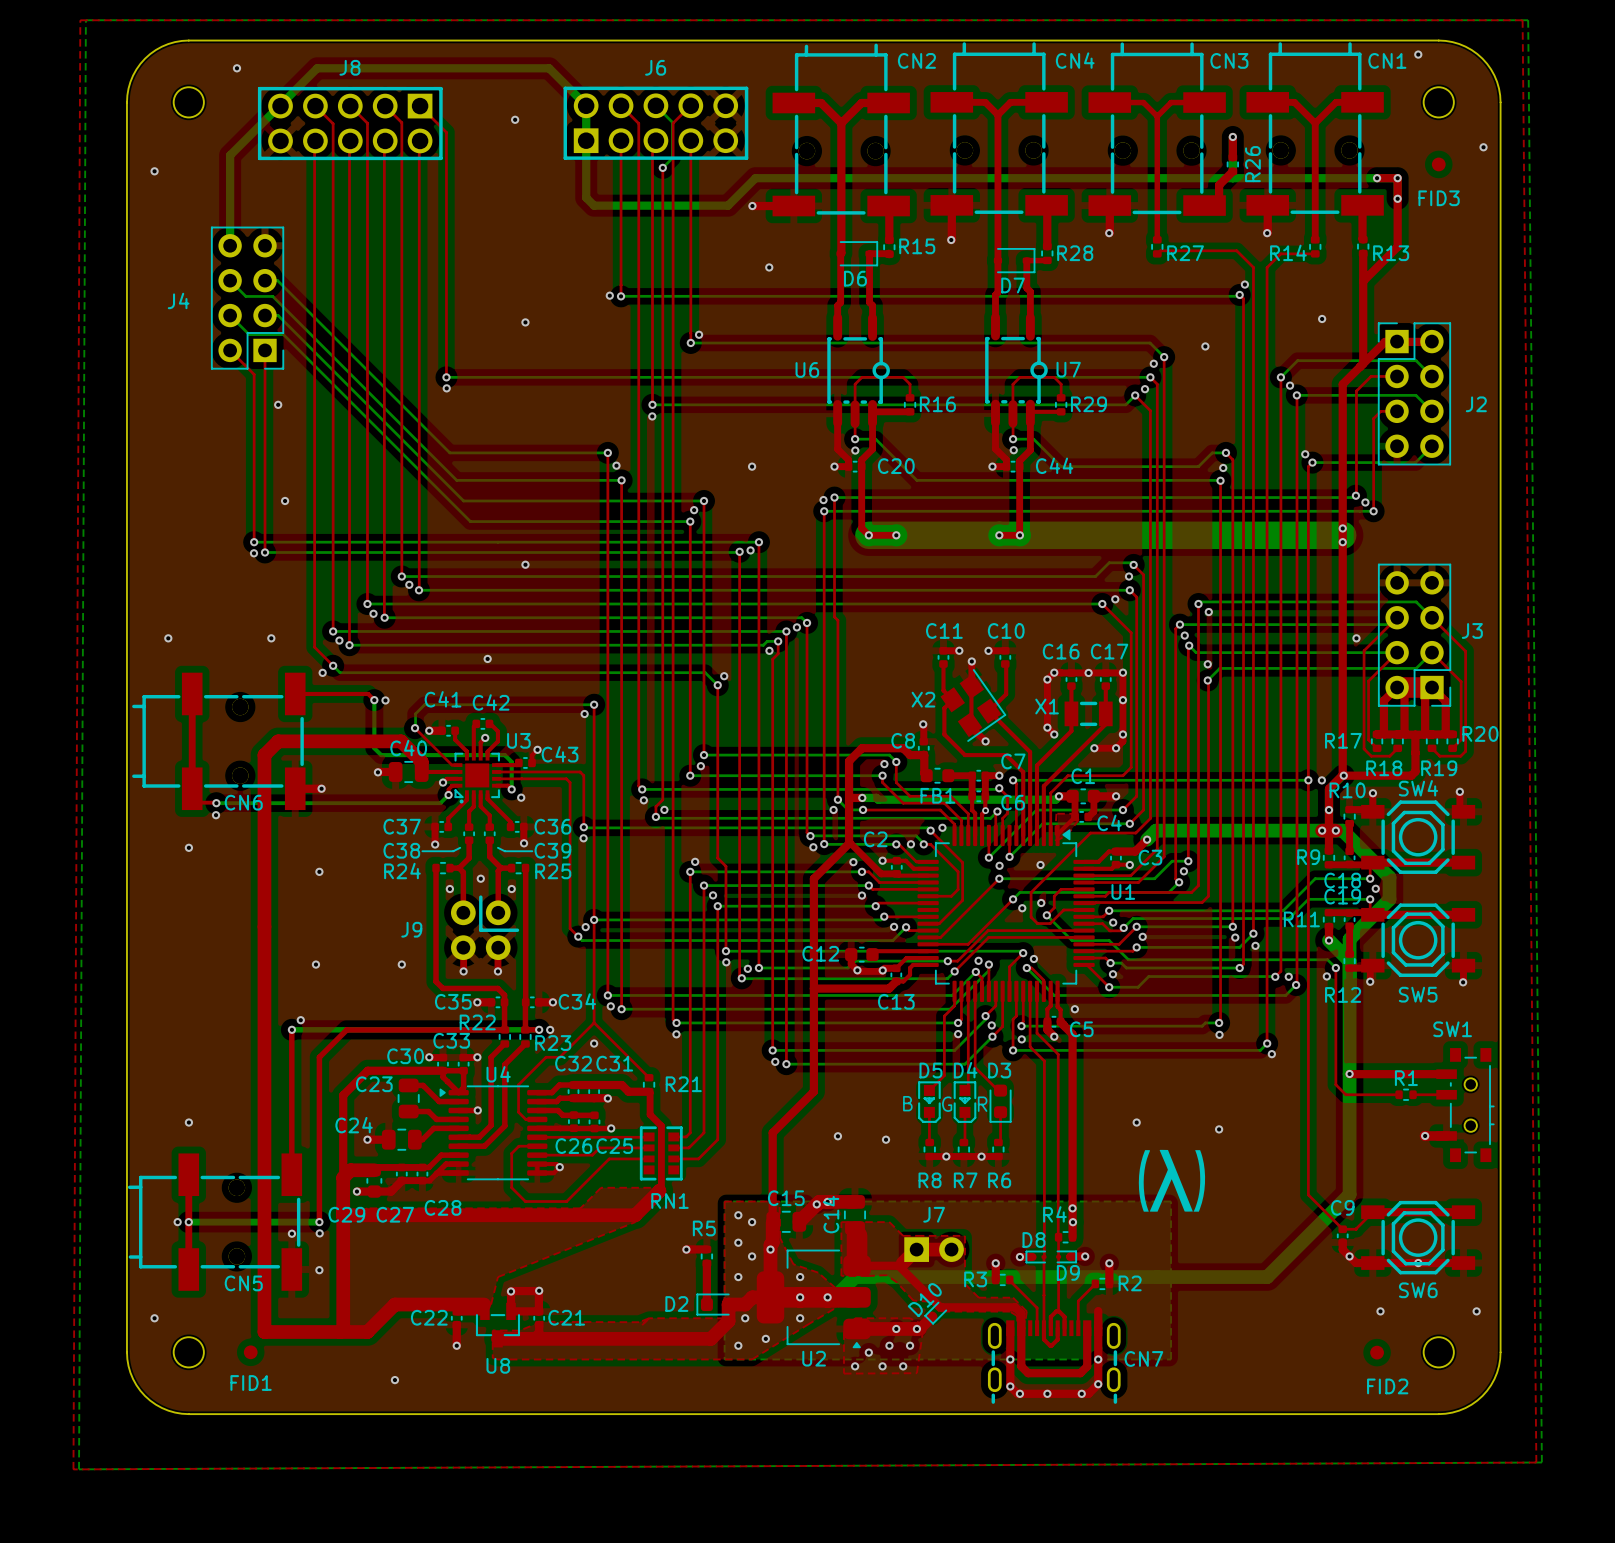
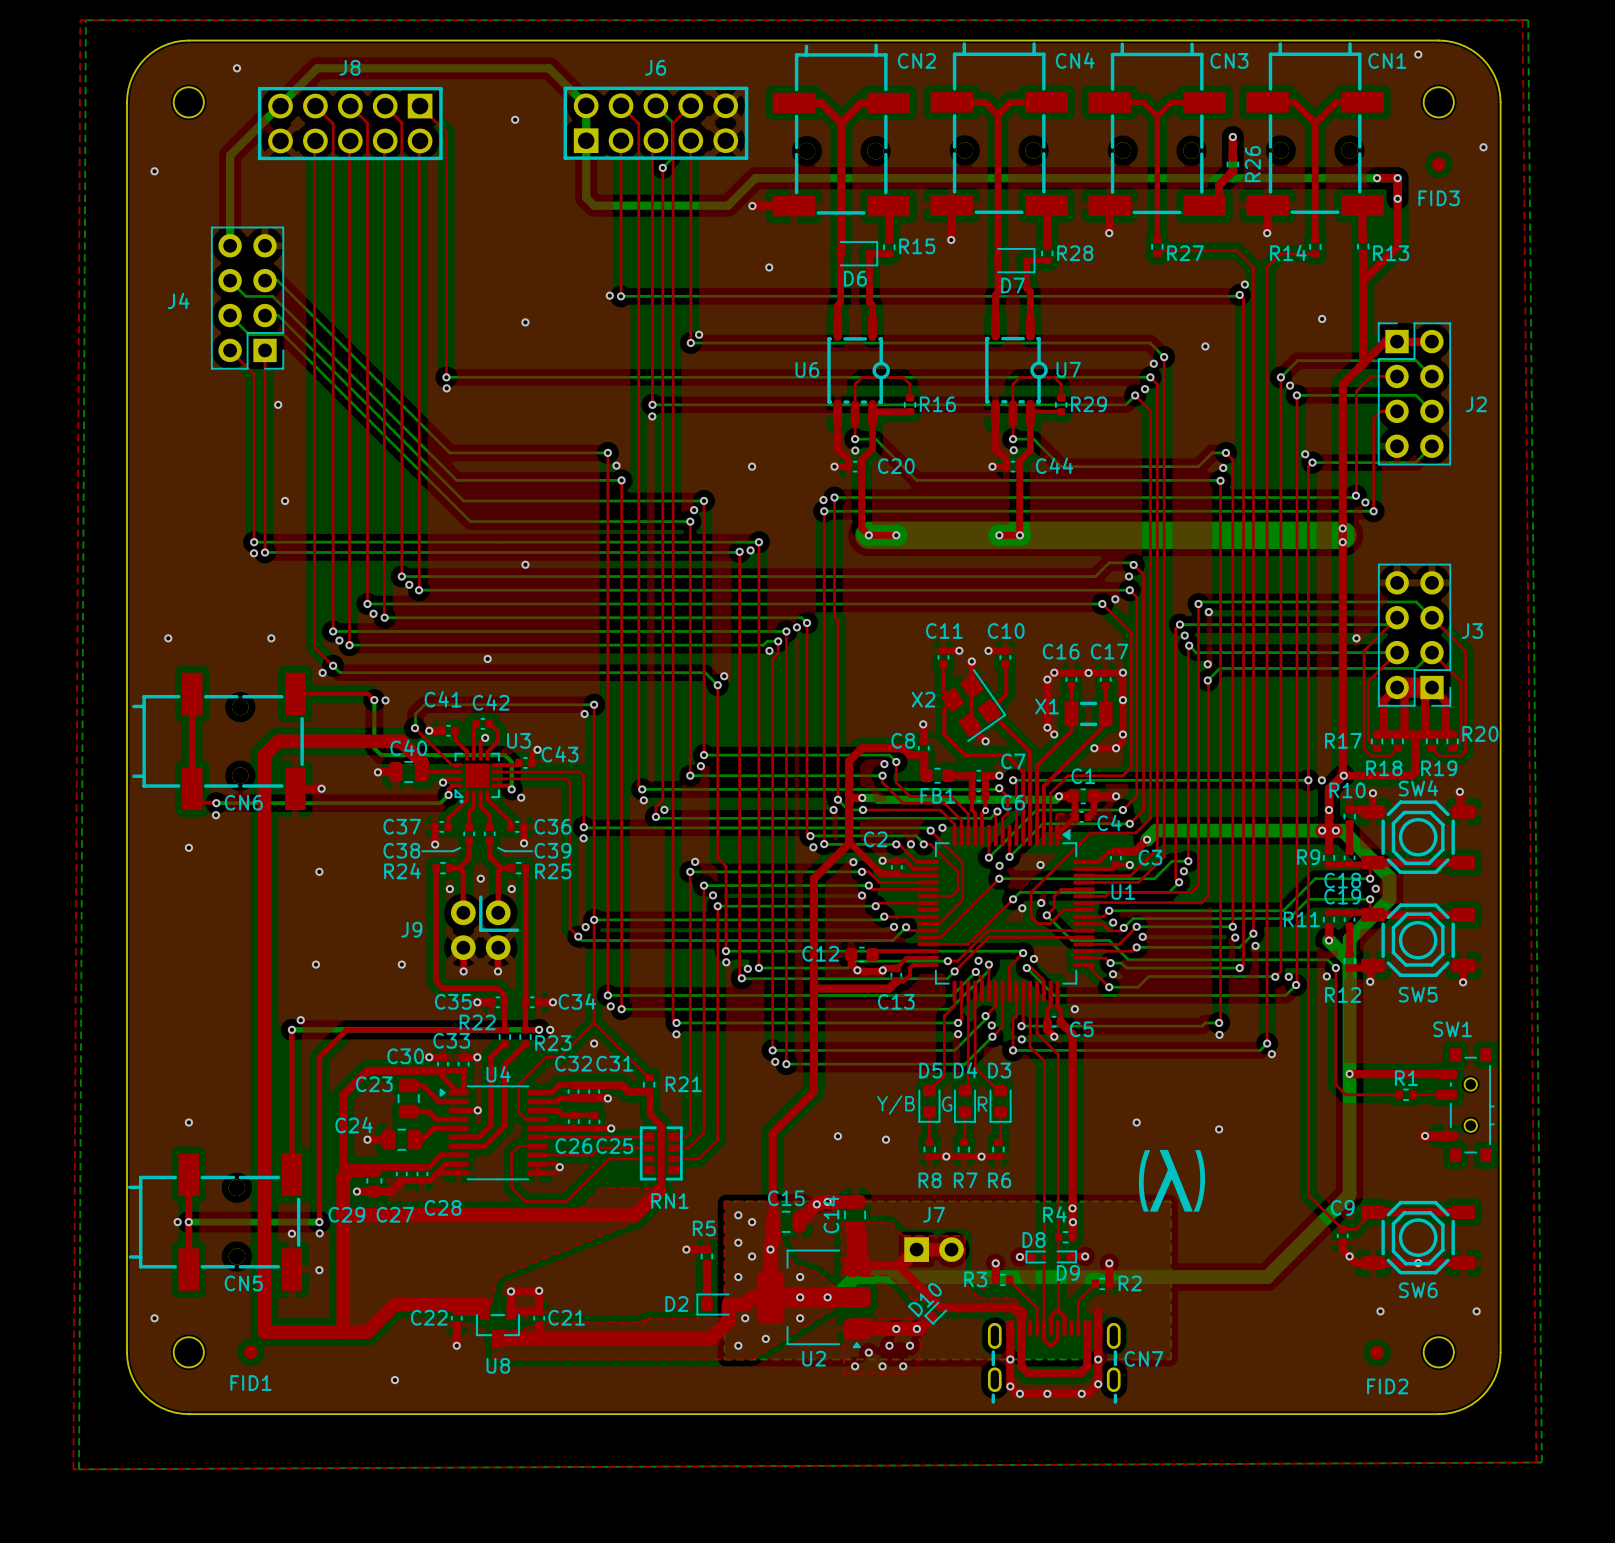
D5 footprint: [918, 1081, 941, 1123] -> [918, 1084, 941, 1123]
D4 footprint: [953, 1081, 977, 1123] -> [954, 1084, 976, 1123]
text: B (907, 1103) -> none
text: none -> Y/B (895, 1104)

